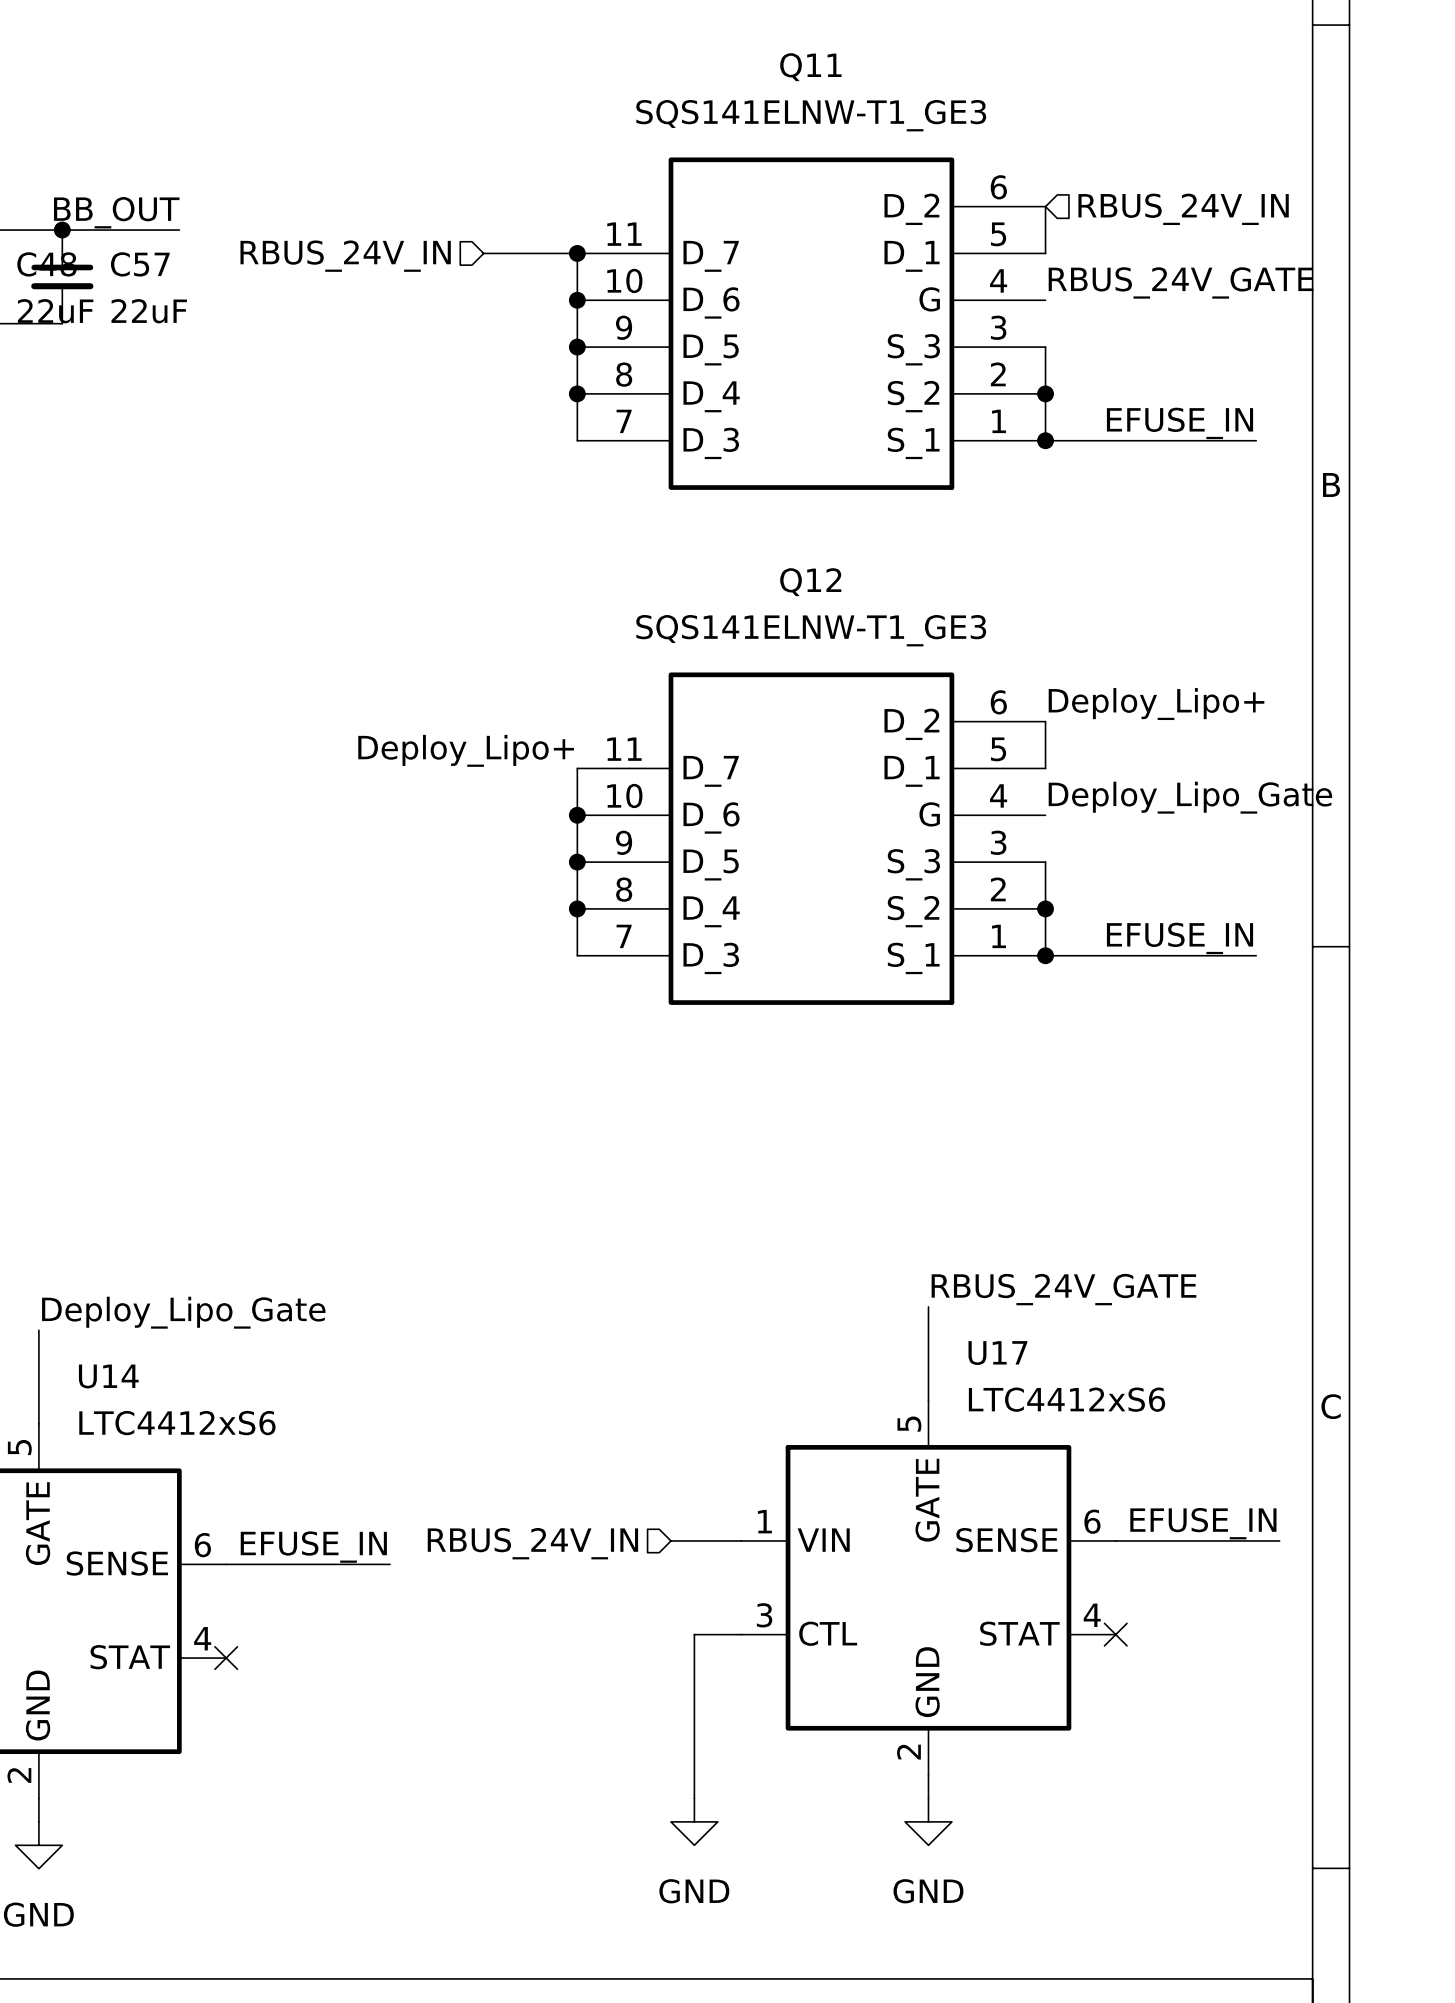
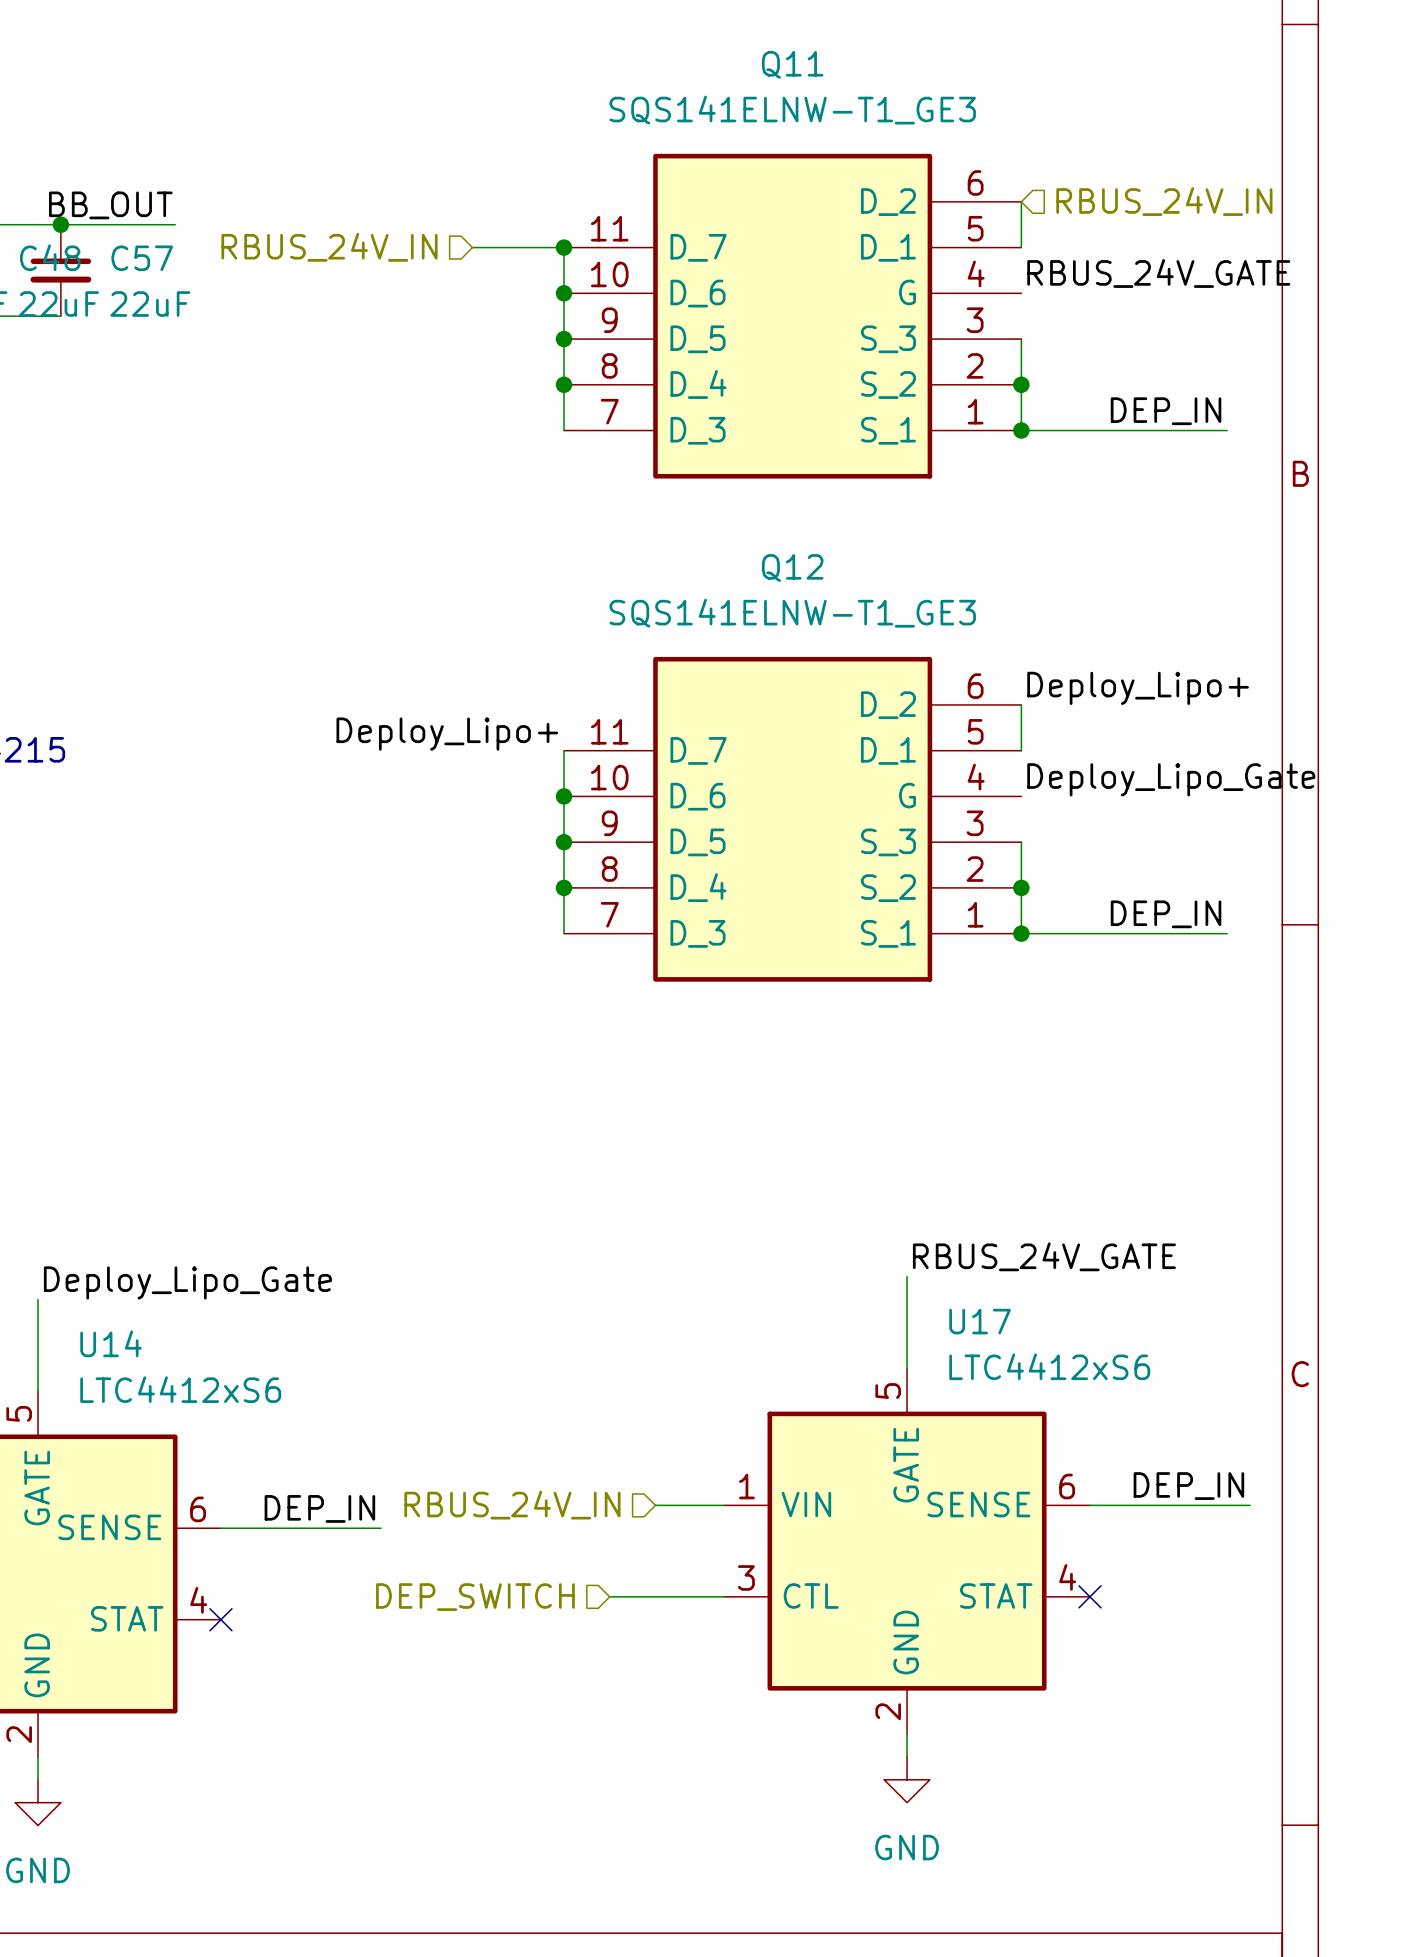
label: EFUSE_IN (1179, 423) -> DEP_IN (1166, 411)
label: EFUSE_IN (1179, 938) -> DEP_IN (1166, 914)
label: EFUSE_IN (1203, 1523) -> DEP_IN (1188, 1486)
label: EFUSE_IN (313, 1547) -> DEP_IN (319, 1508)
wire: (694, 1634) (694, 1798) -> (678, 1596) (609, 1596)
hierarchical label: none -> DEP_SWITCH (475, 1597)
power symbol: GND (694, 1821) -> none

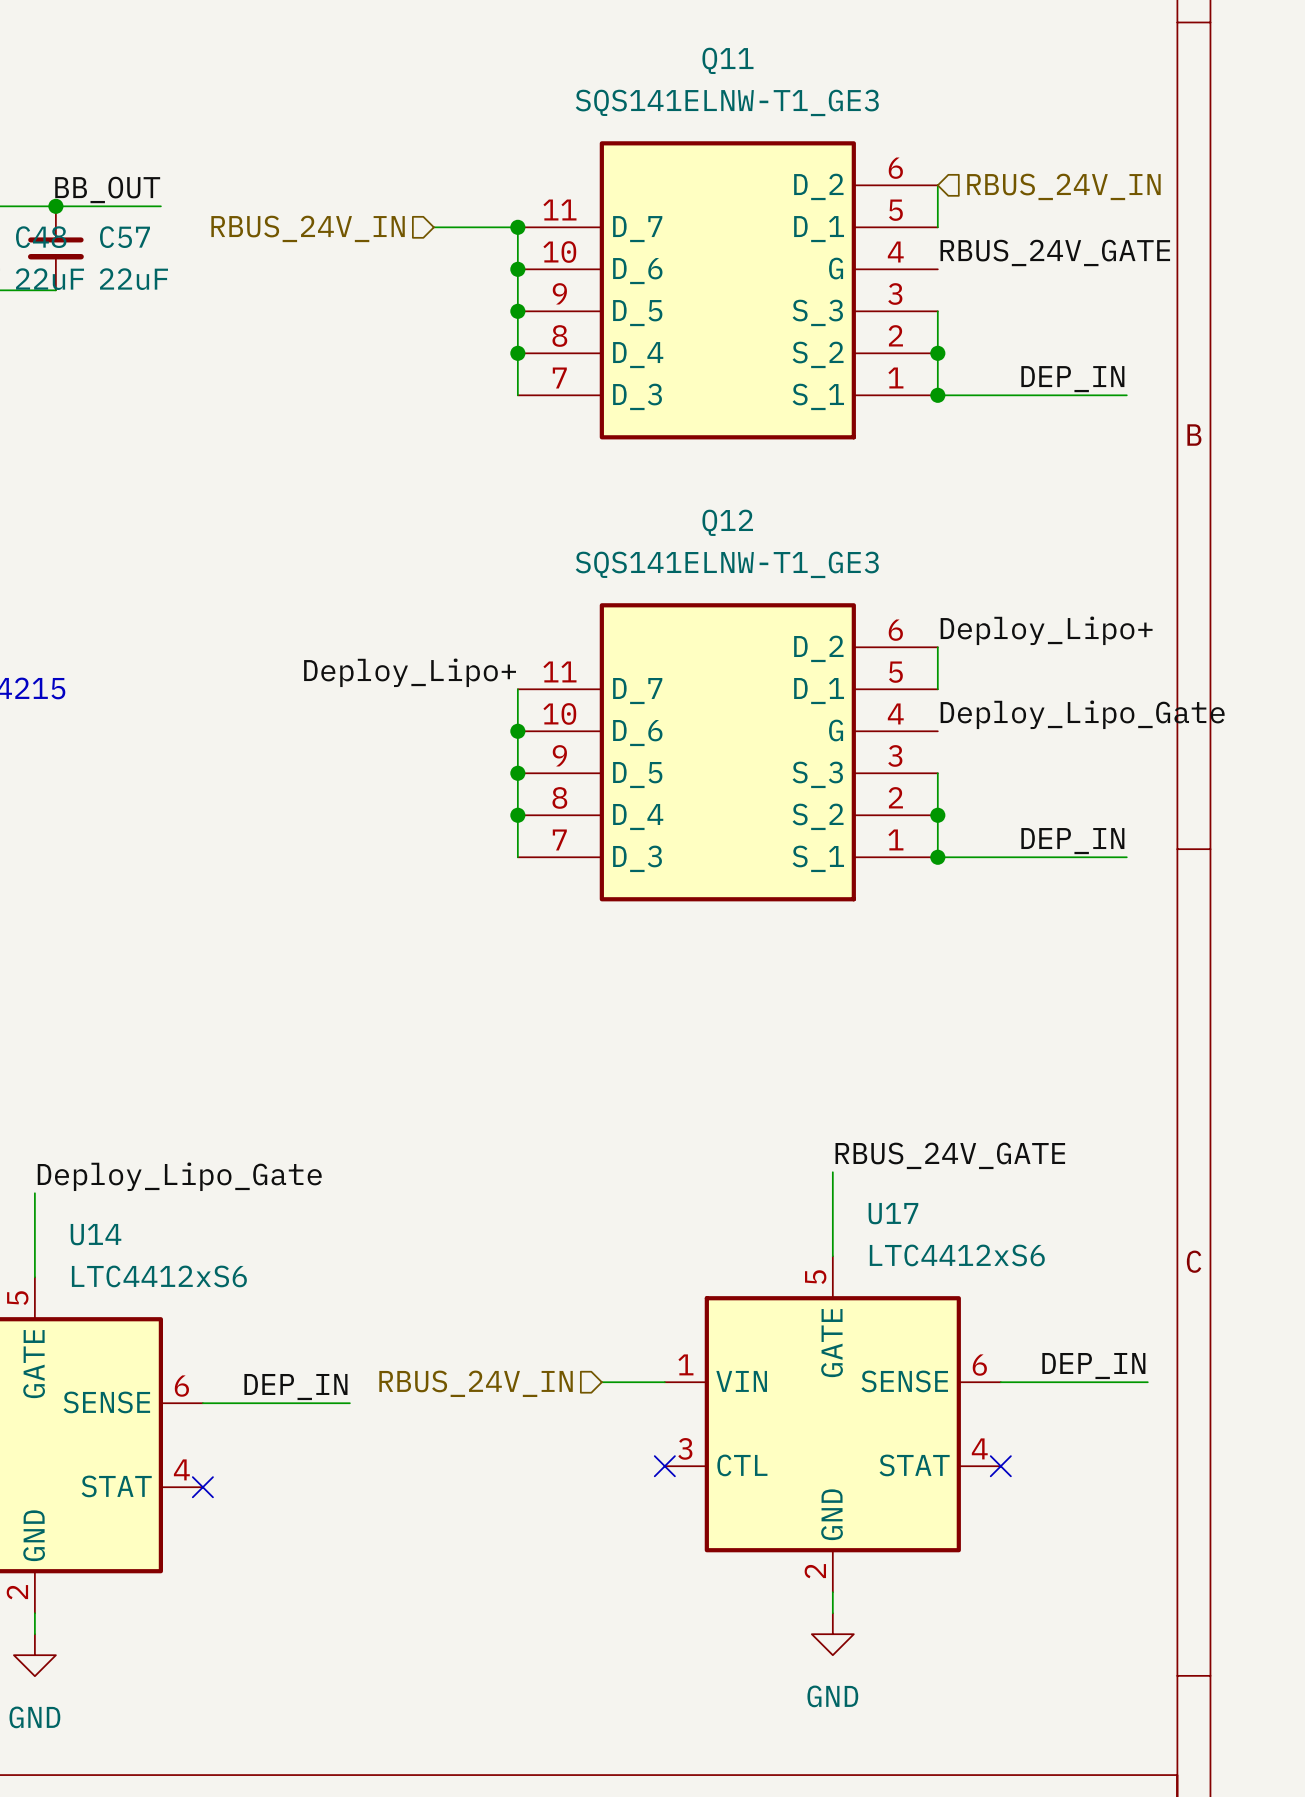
wire: (609, 1596) (724, 1596) -> none
no-connect mark: none -> (664, 1466)
hierarchical label: DEP_SWITCH (475, 1597) -> none

